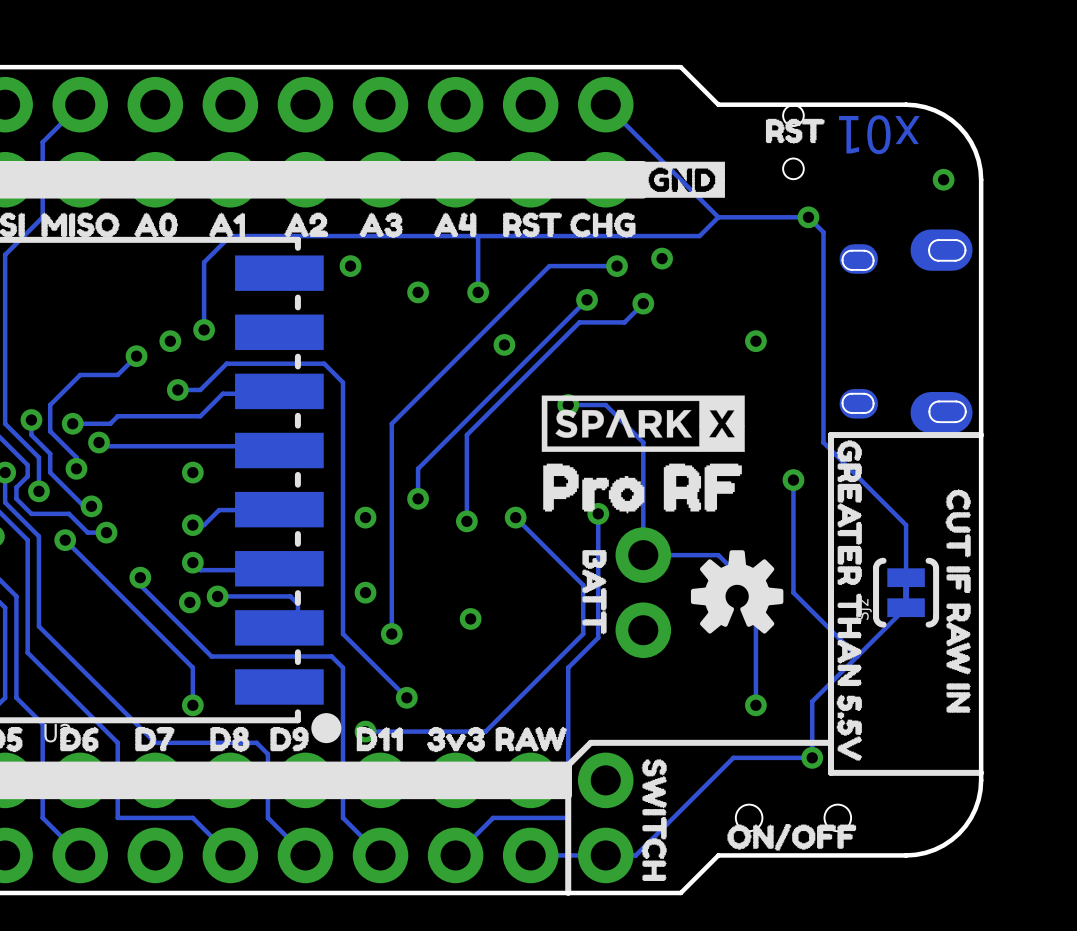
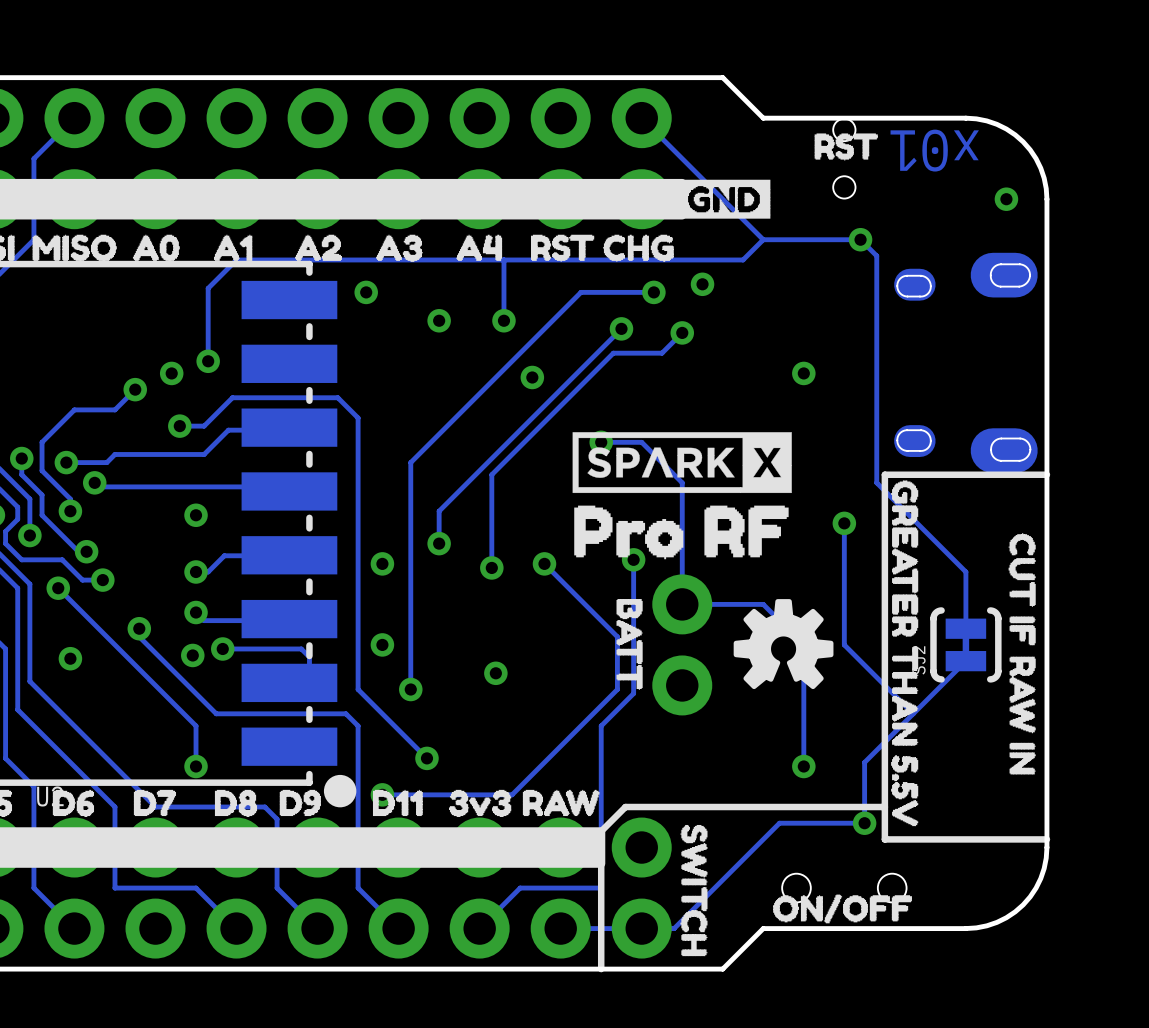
via: none -> (70, 658)

